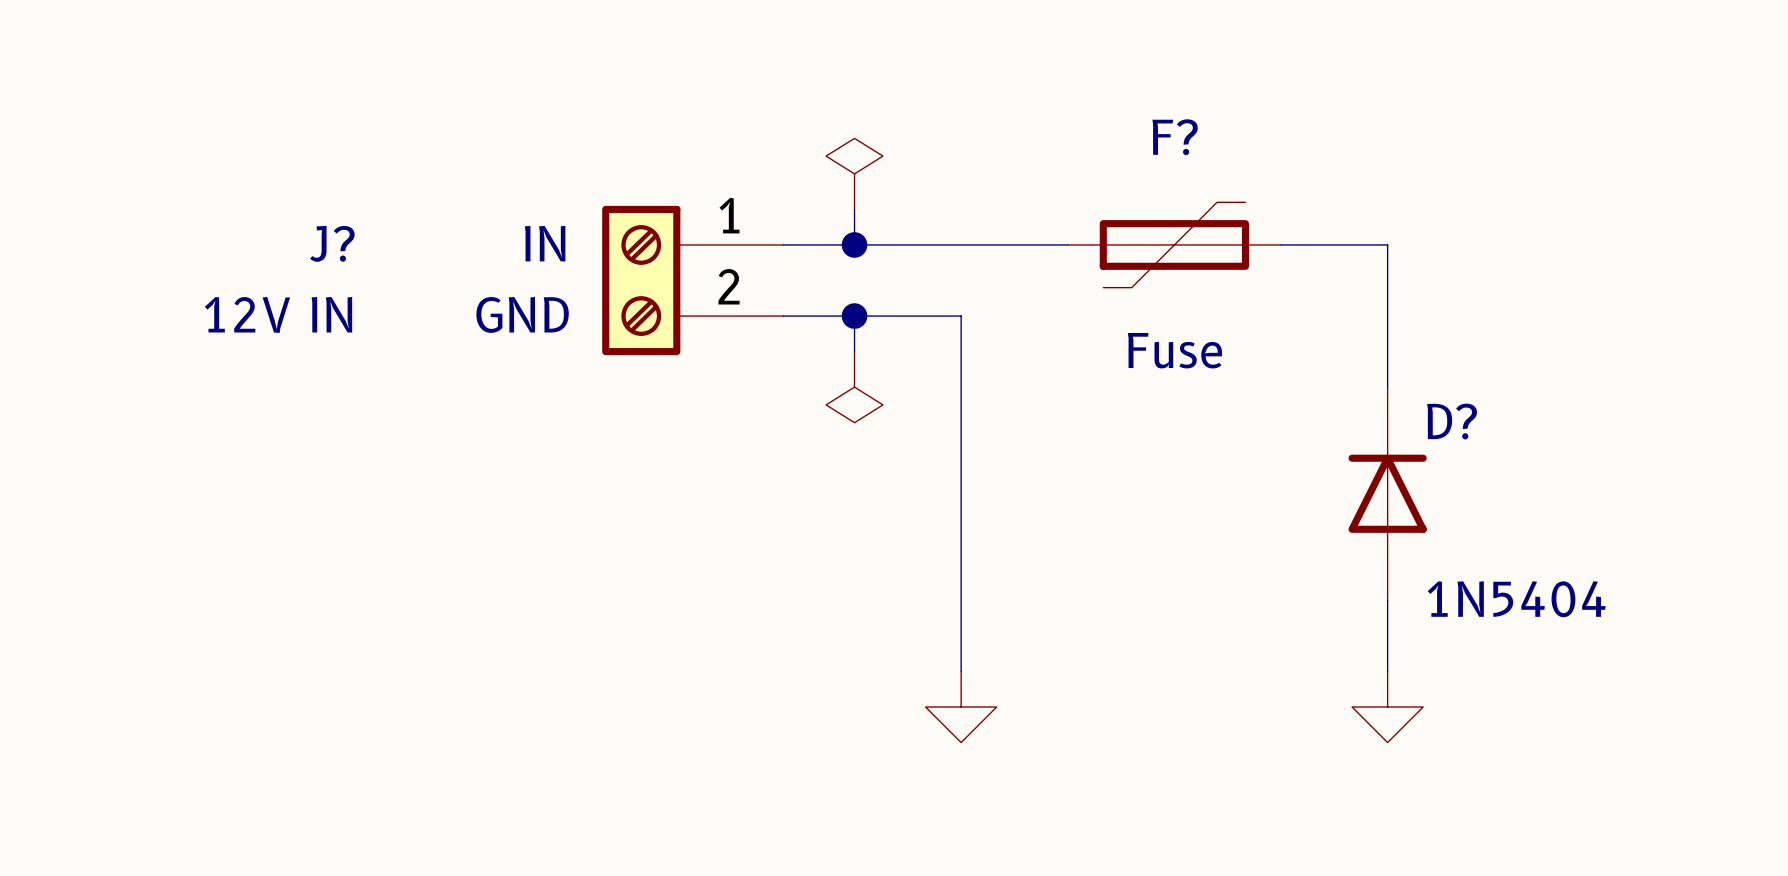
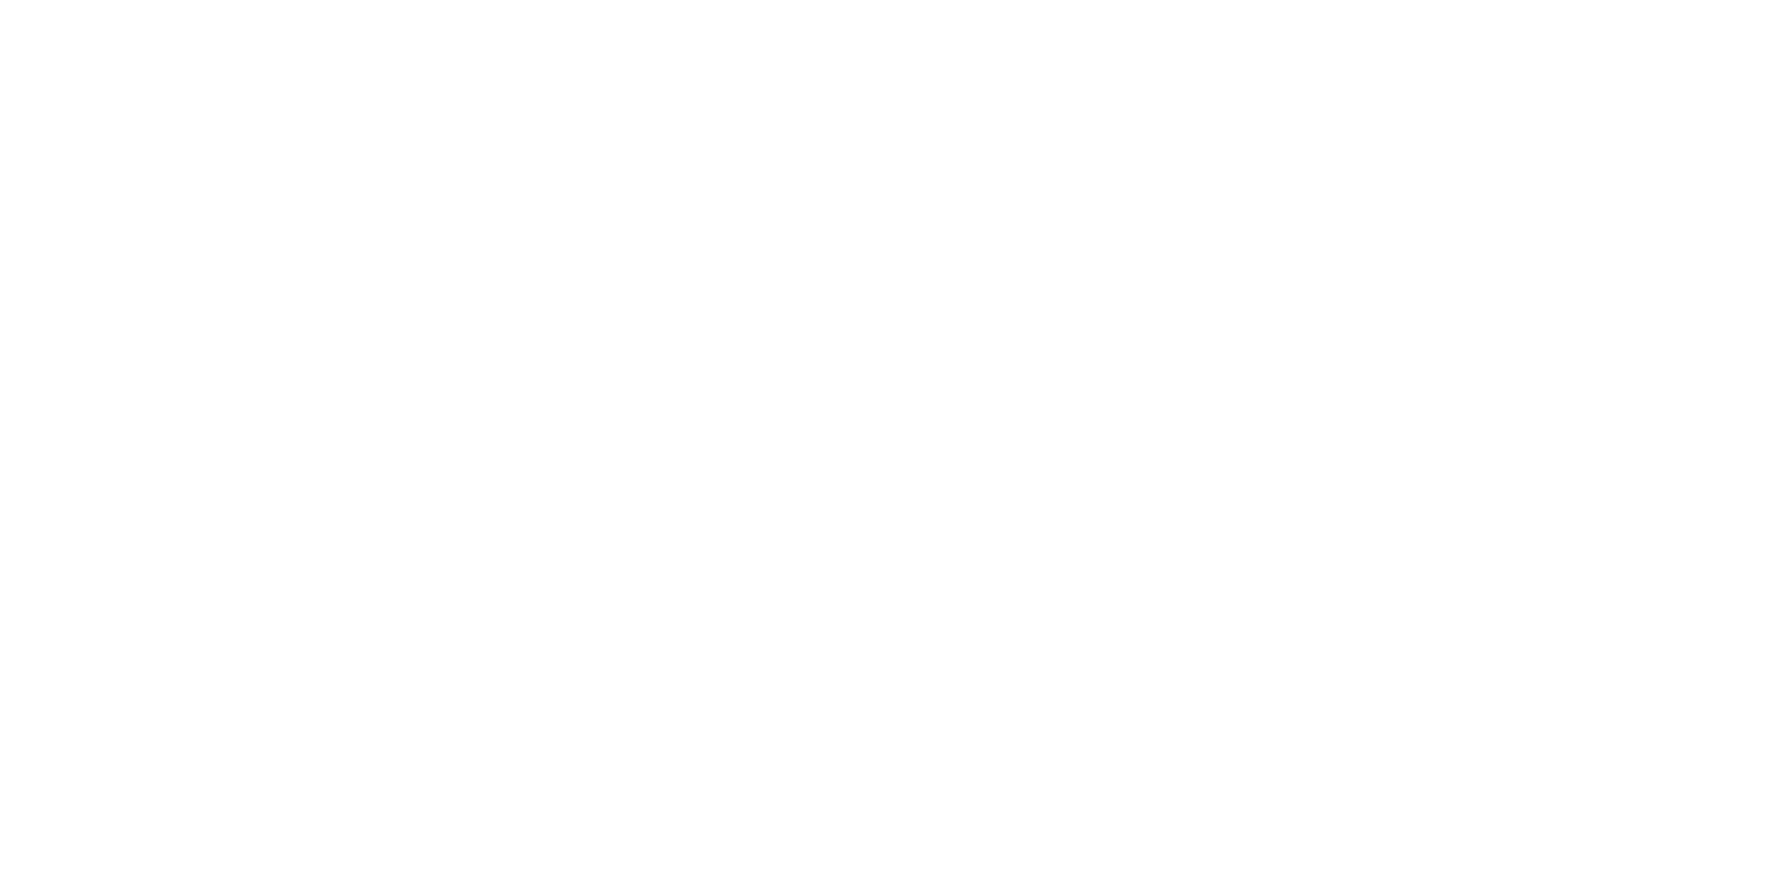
power symbol: (854, 173) -> none
wire: (854, 209) (854, 244) -> none
wire: (783, 244) (1067, 244) -> none
junction: (854, 244) -> none
F?: Fuse (1174, 244) -> none
wire: (1281, 244) (1387, 244) (1387, 387) -> none
J?: (692, 280) -> none
wire: (783, 316) (961, 316) (961, 671) -> none
wire: (854, 316) (854, 351) -> none
junction: (854, 316) -> none
power symbol: (854, 387) -> none
D?: 1N5404 (1387, 493) -> none
wire: (1387, 600) (1387, 671) -> none
power symbol: (961, 707) -> none
power symbol: (1387, 707) -> none

